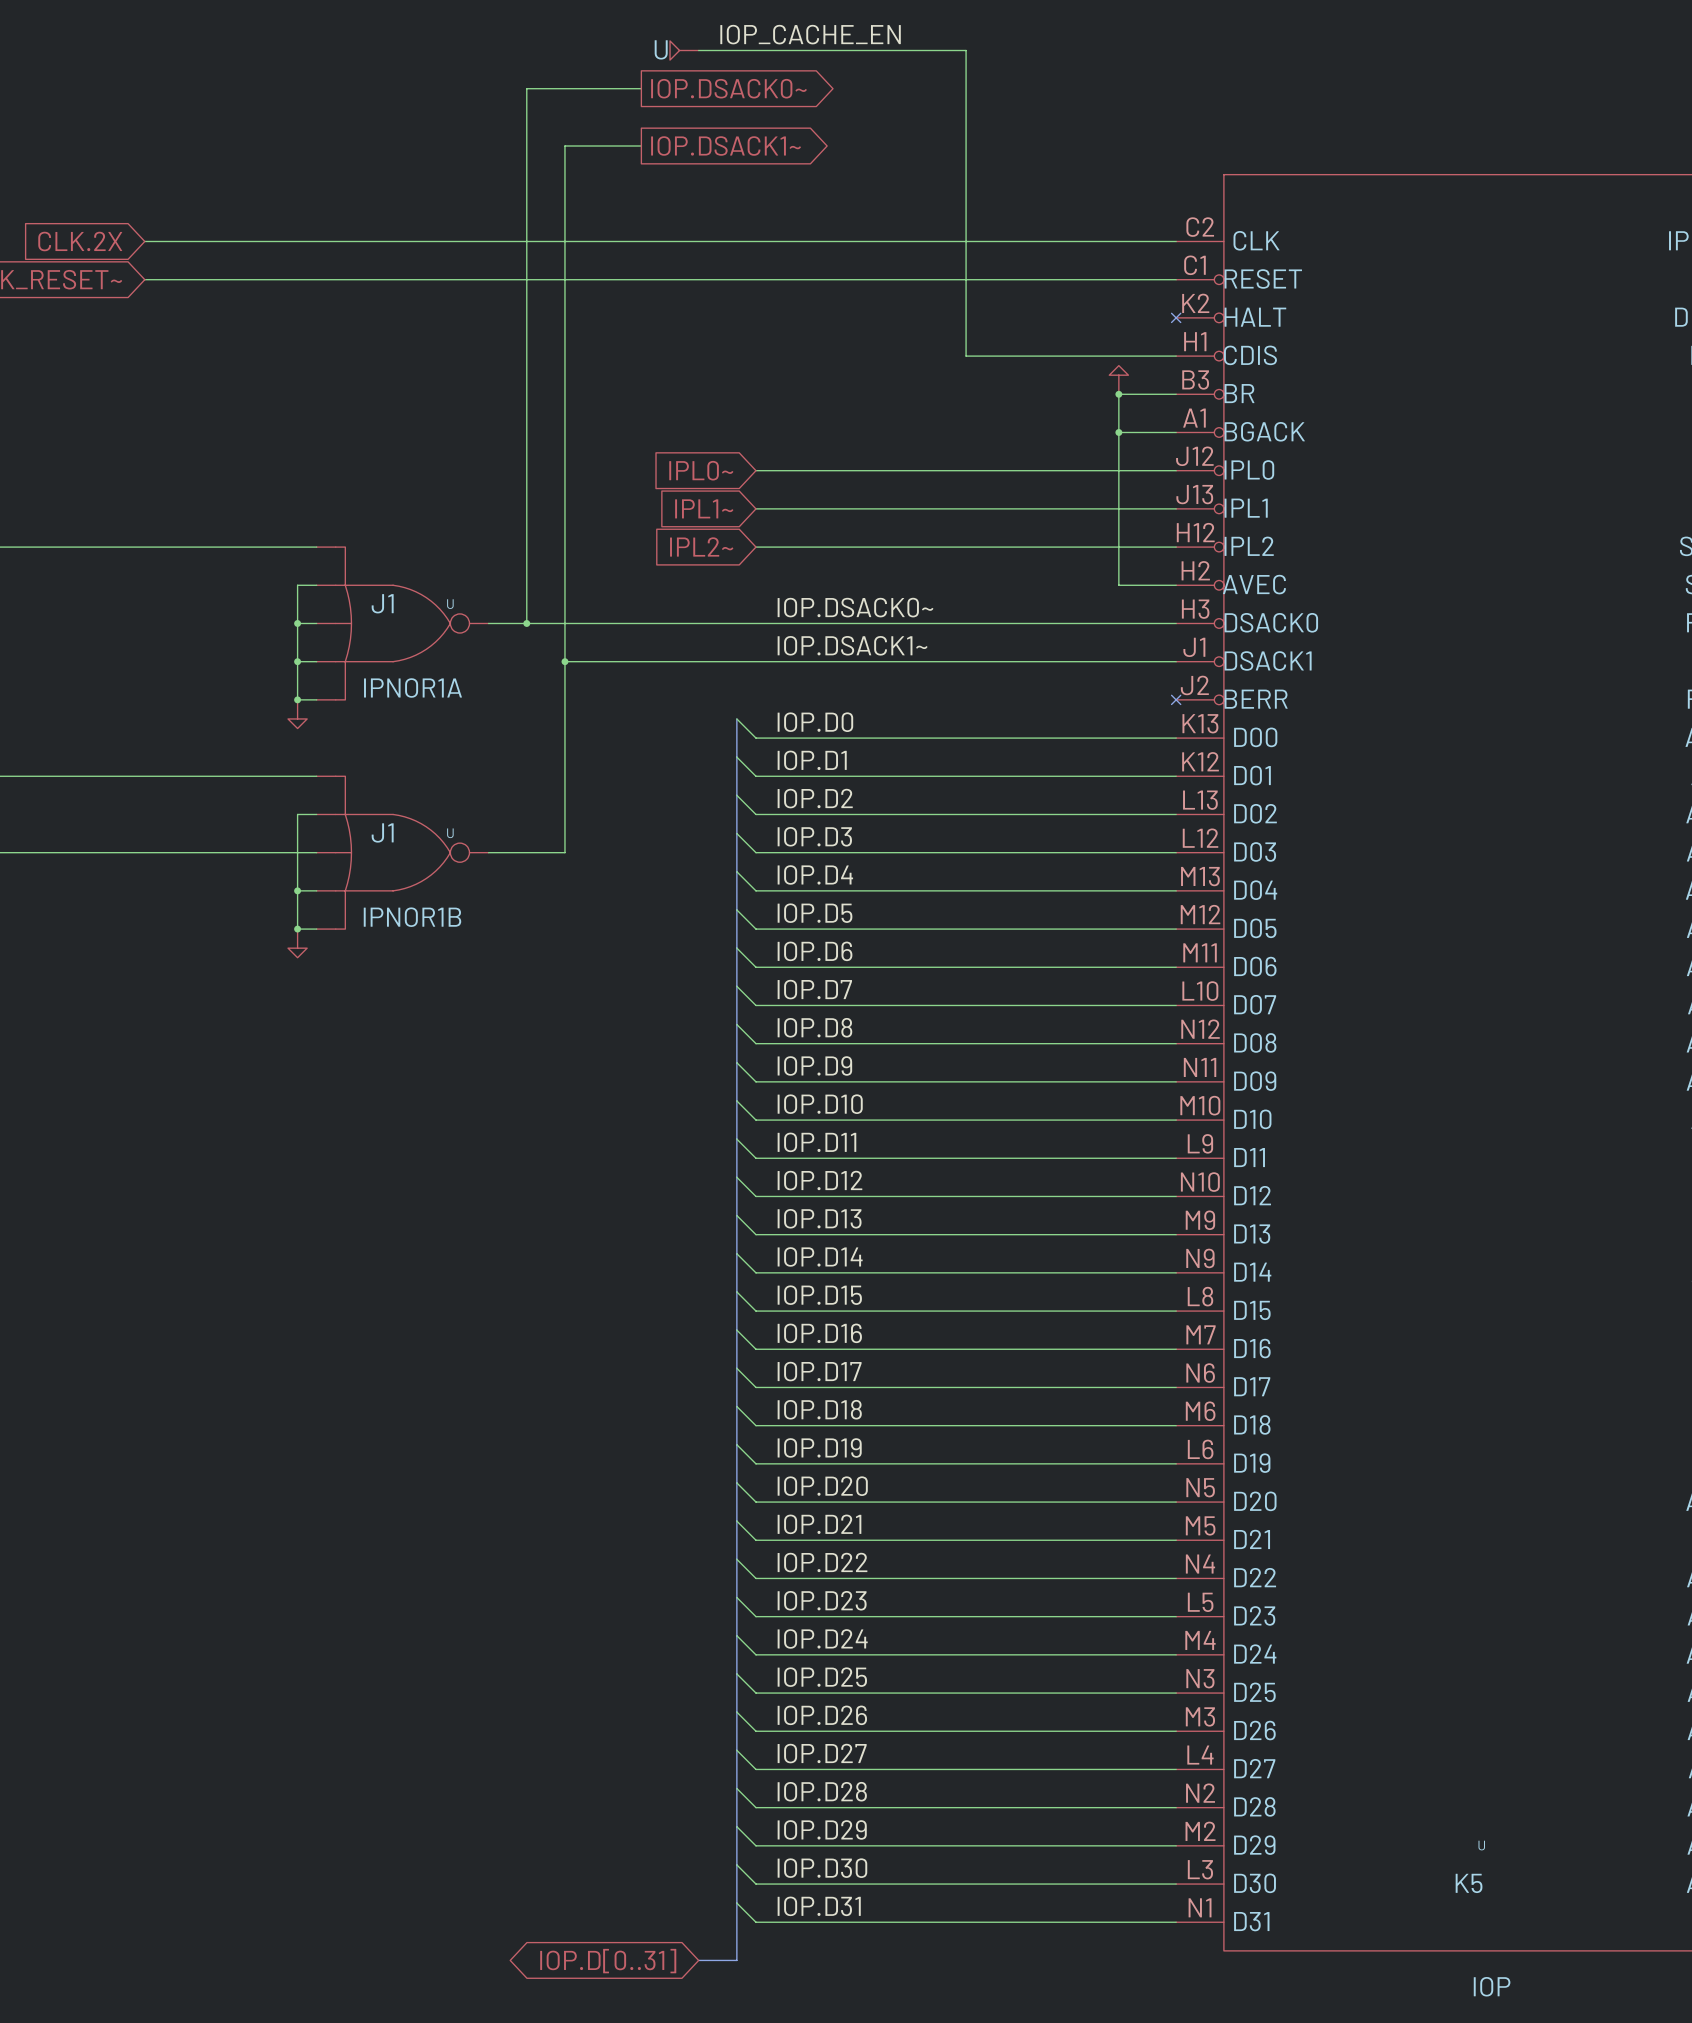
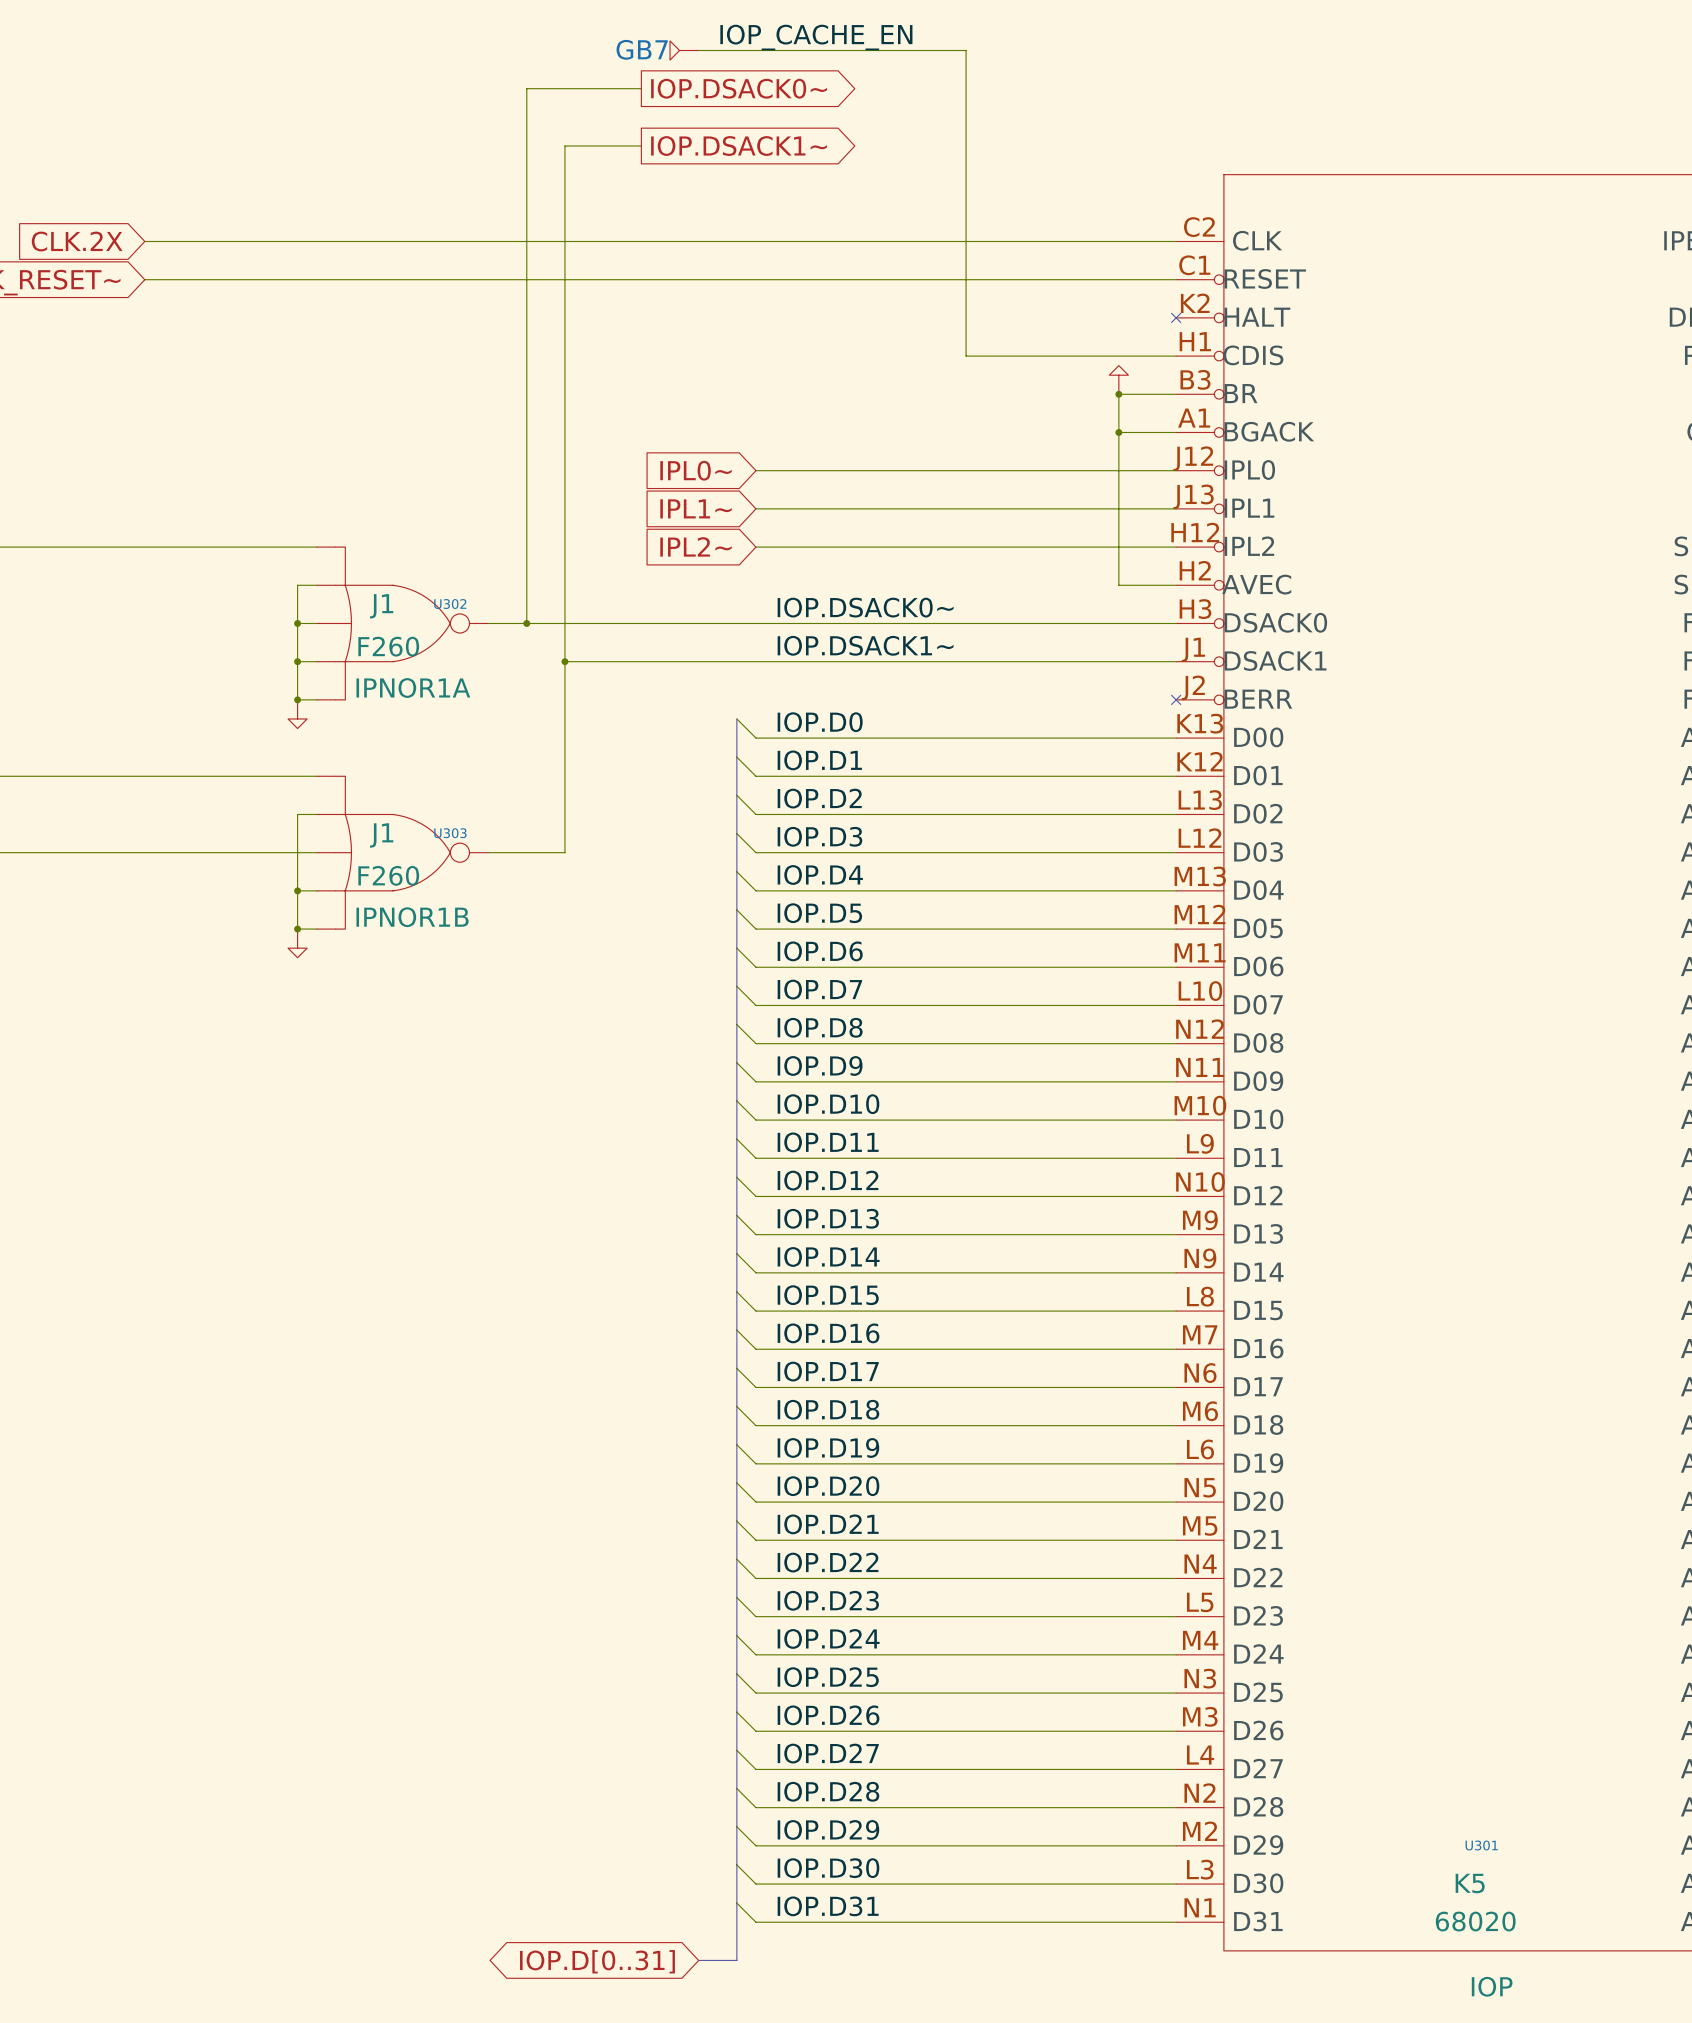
U name: U (661, 49) -> GB7 (642, 49)
U name: U (450, 604) -> U302 (450, 604)
U value: none -> F260 (388, 646)
U name: U (450, 833) -> U303 (450, 833)
U value: none -> F260 (388, 875)
U name: U (1481, 1845) -> U301 (1481, 1845)
U value: none -> 68020 (1475, 1921)

